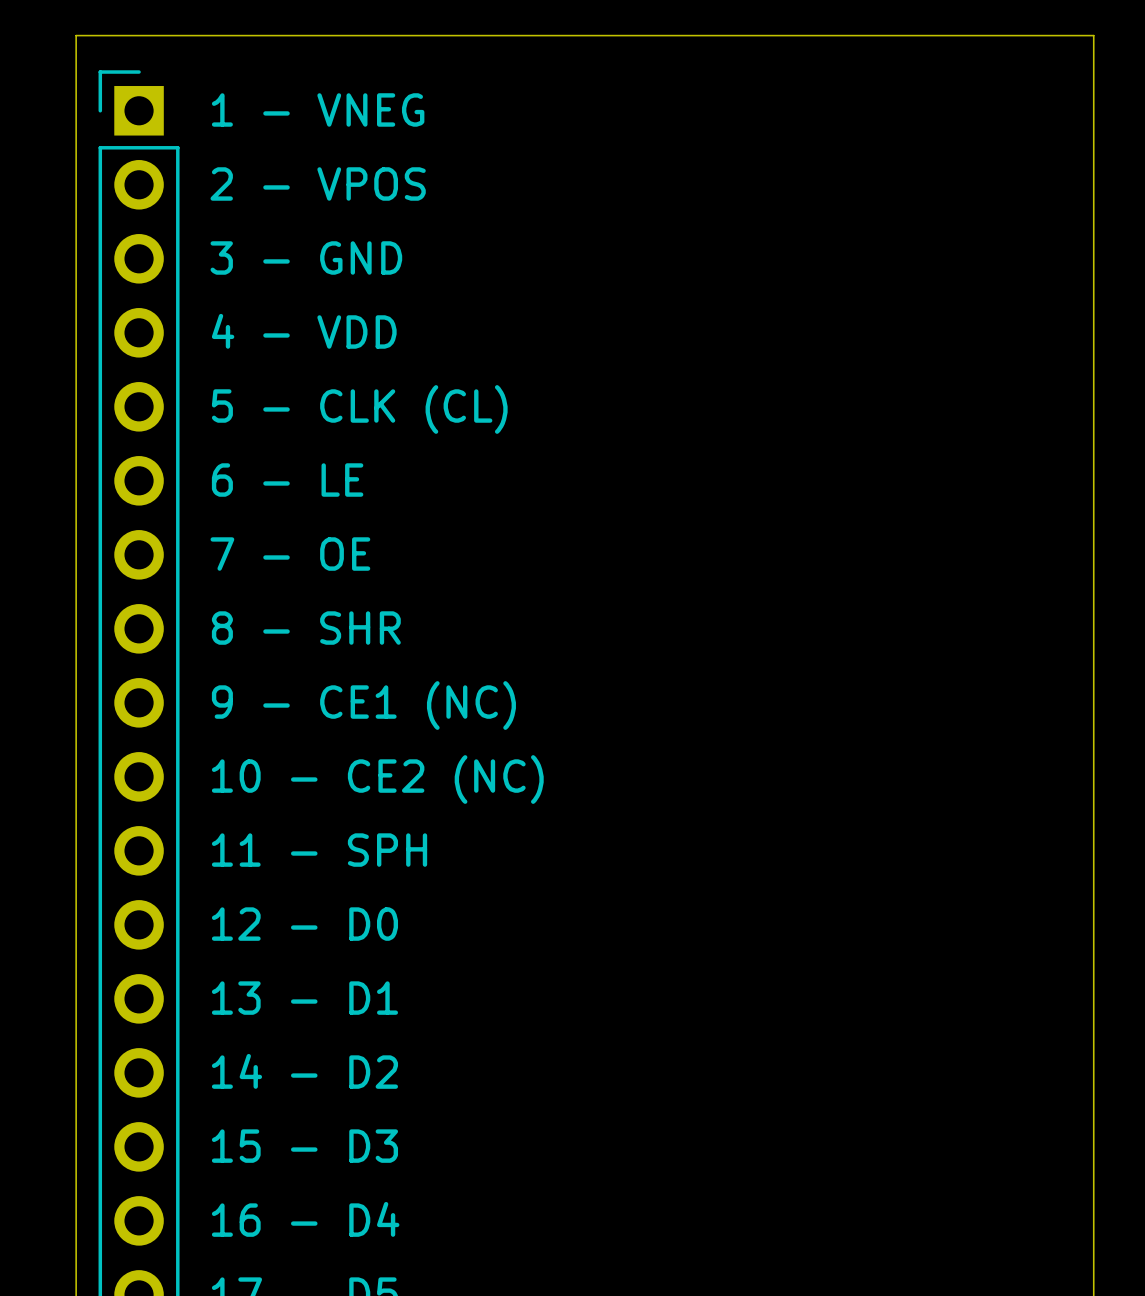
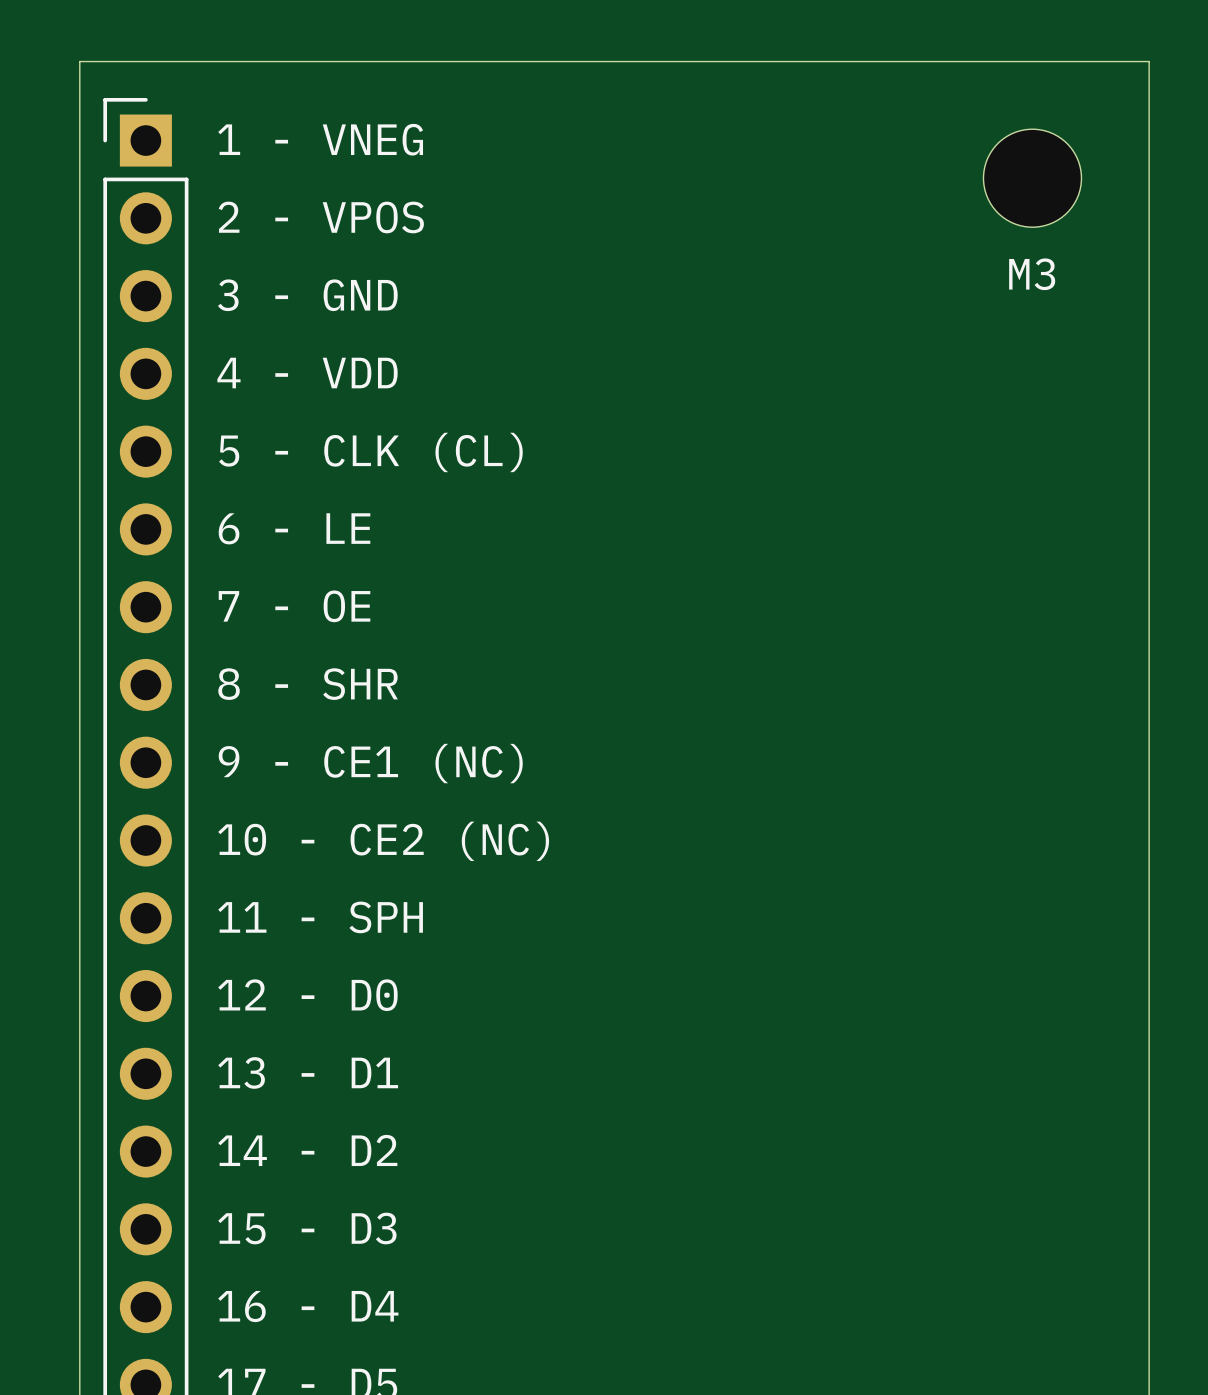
M3: none -> (1032, 178)

